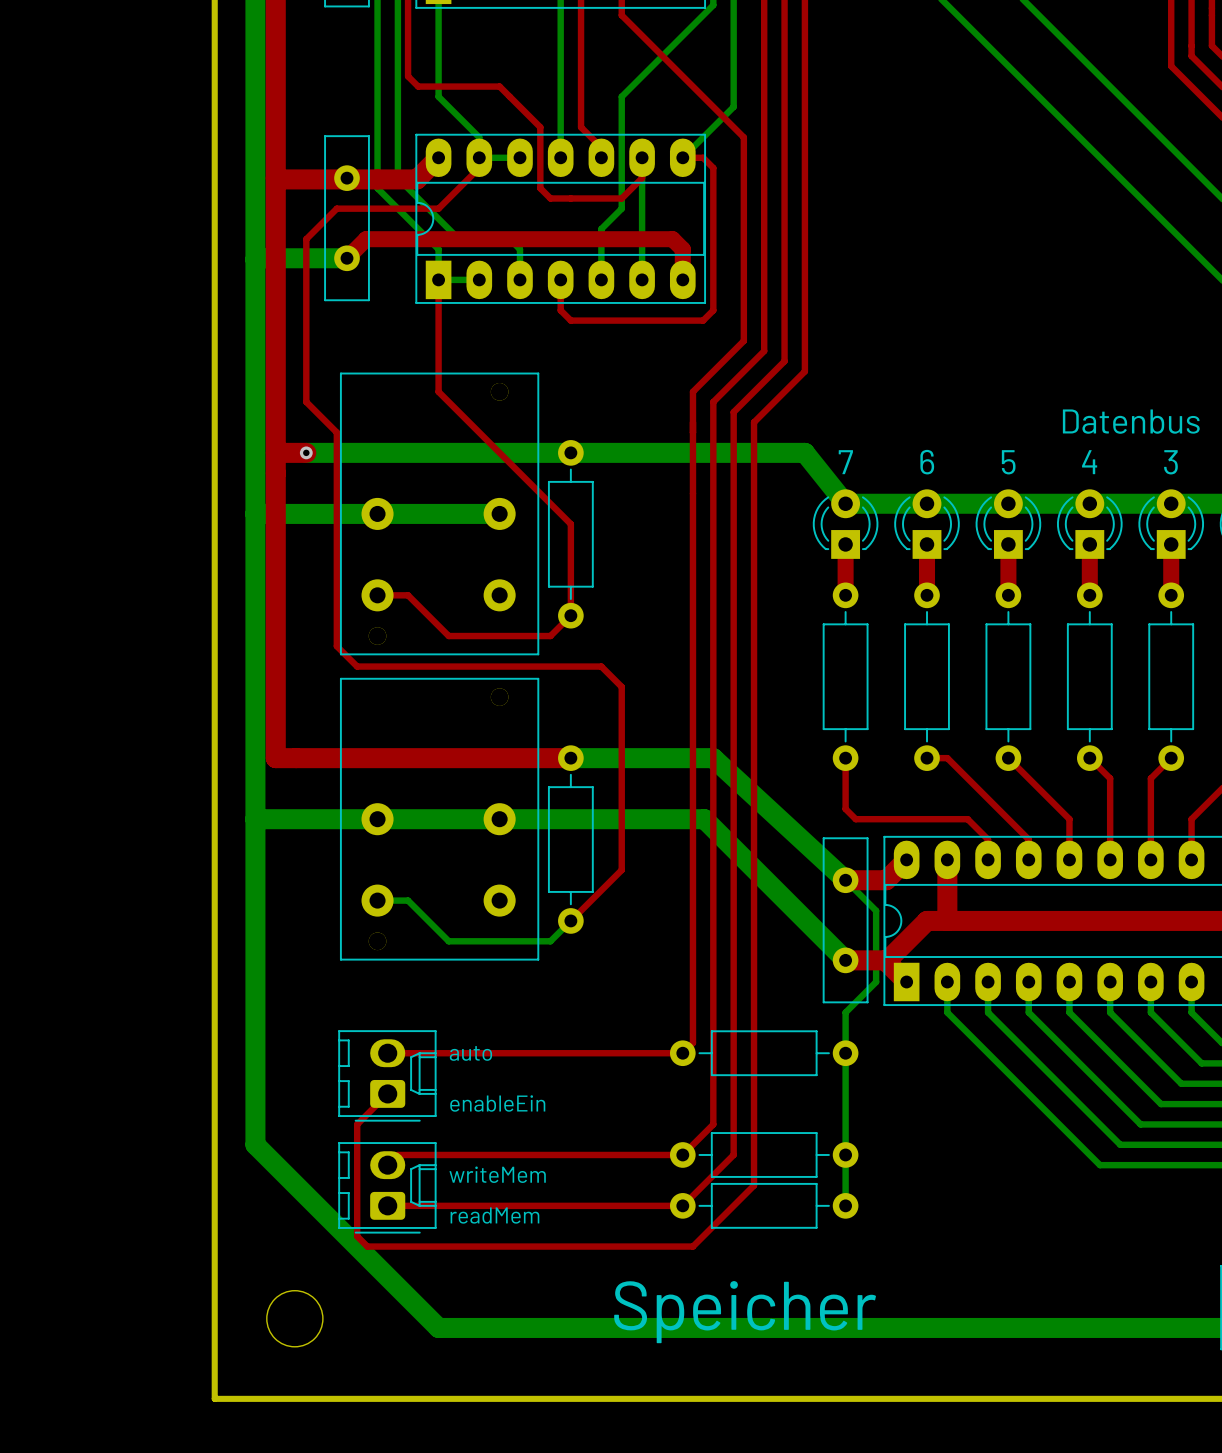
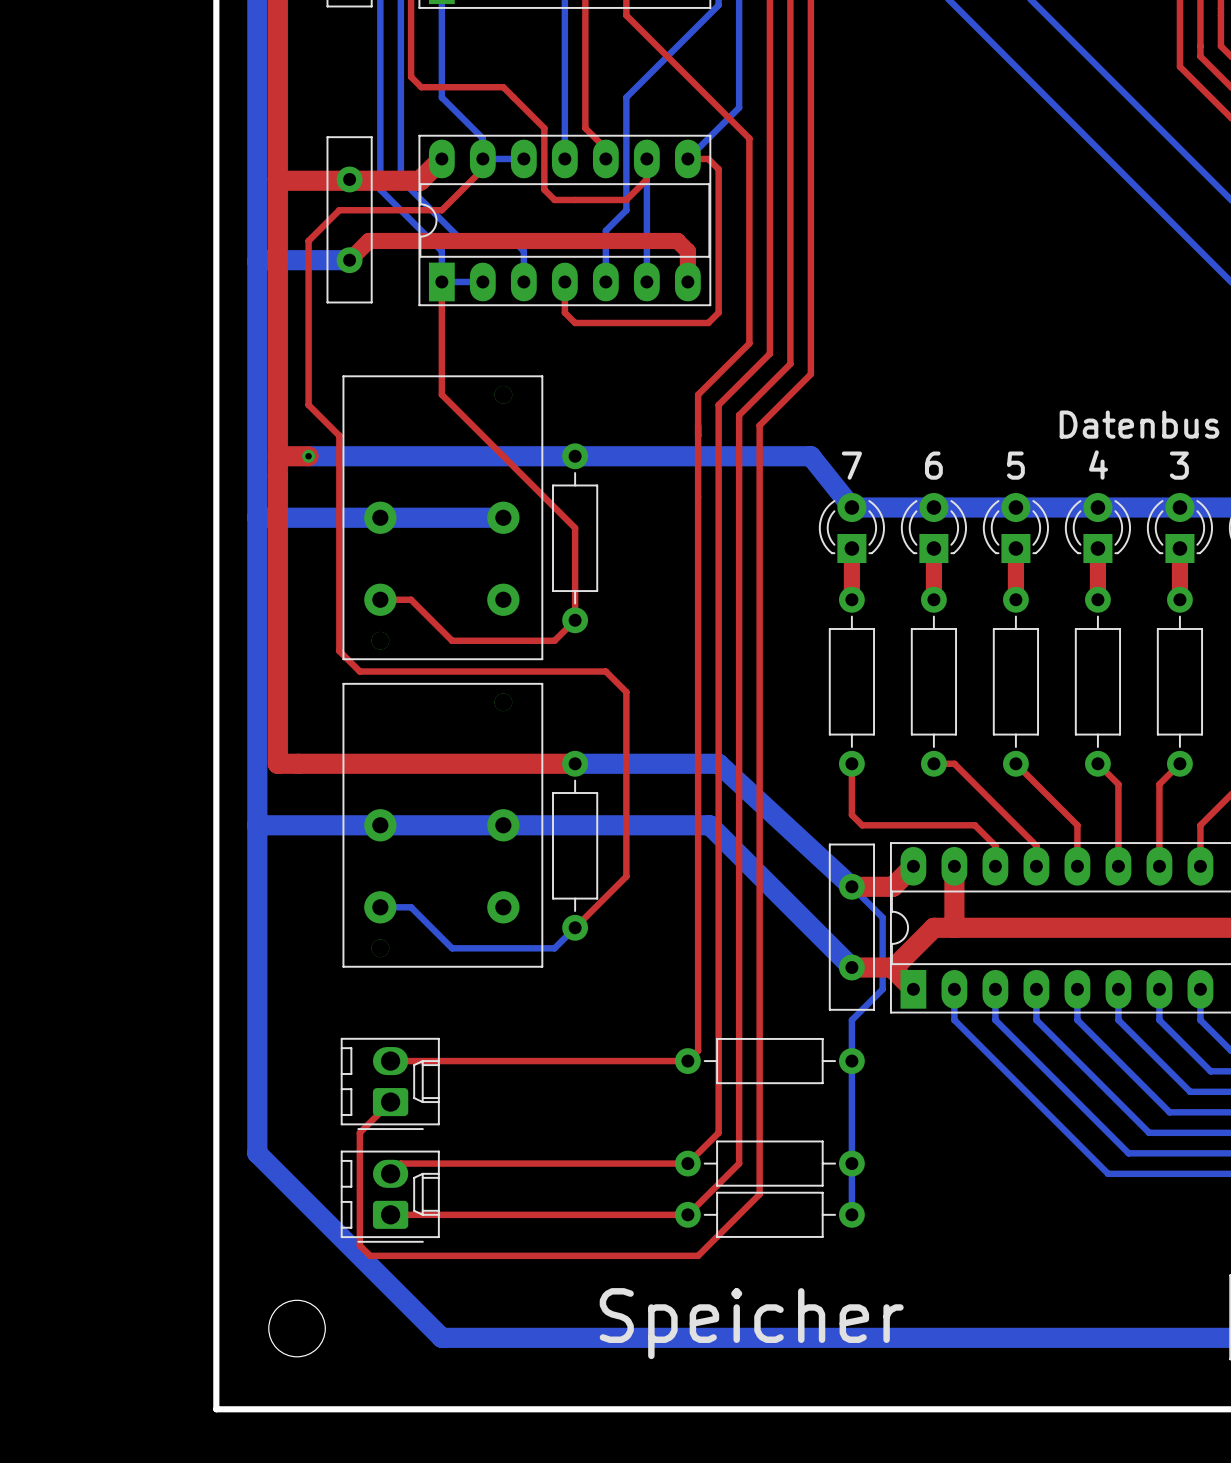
text: auto (470, 1053) -> none
text: enableEin (497, 1103) -> none
text: writeMem (497, 1174) -> none
text: readMem (494, 1215) -> none

